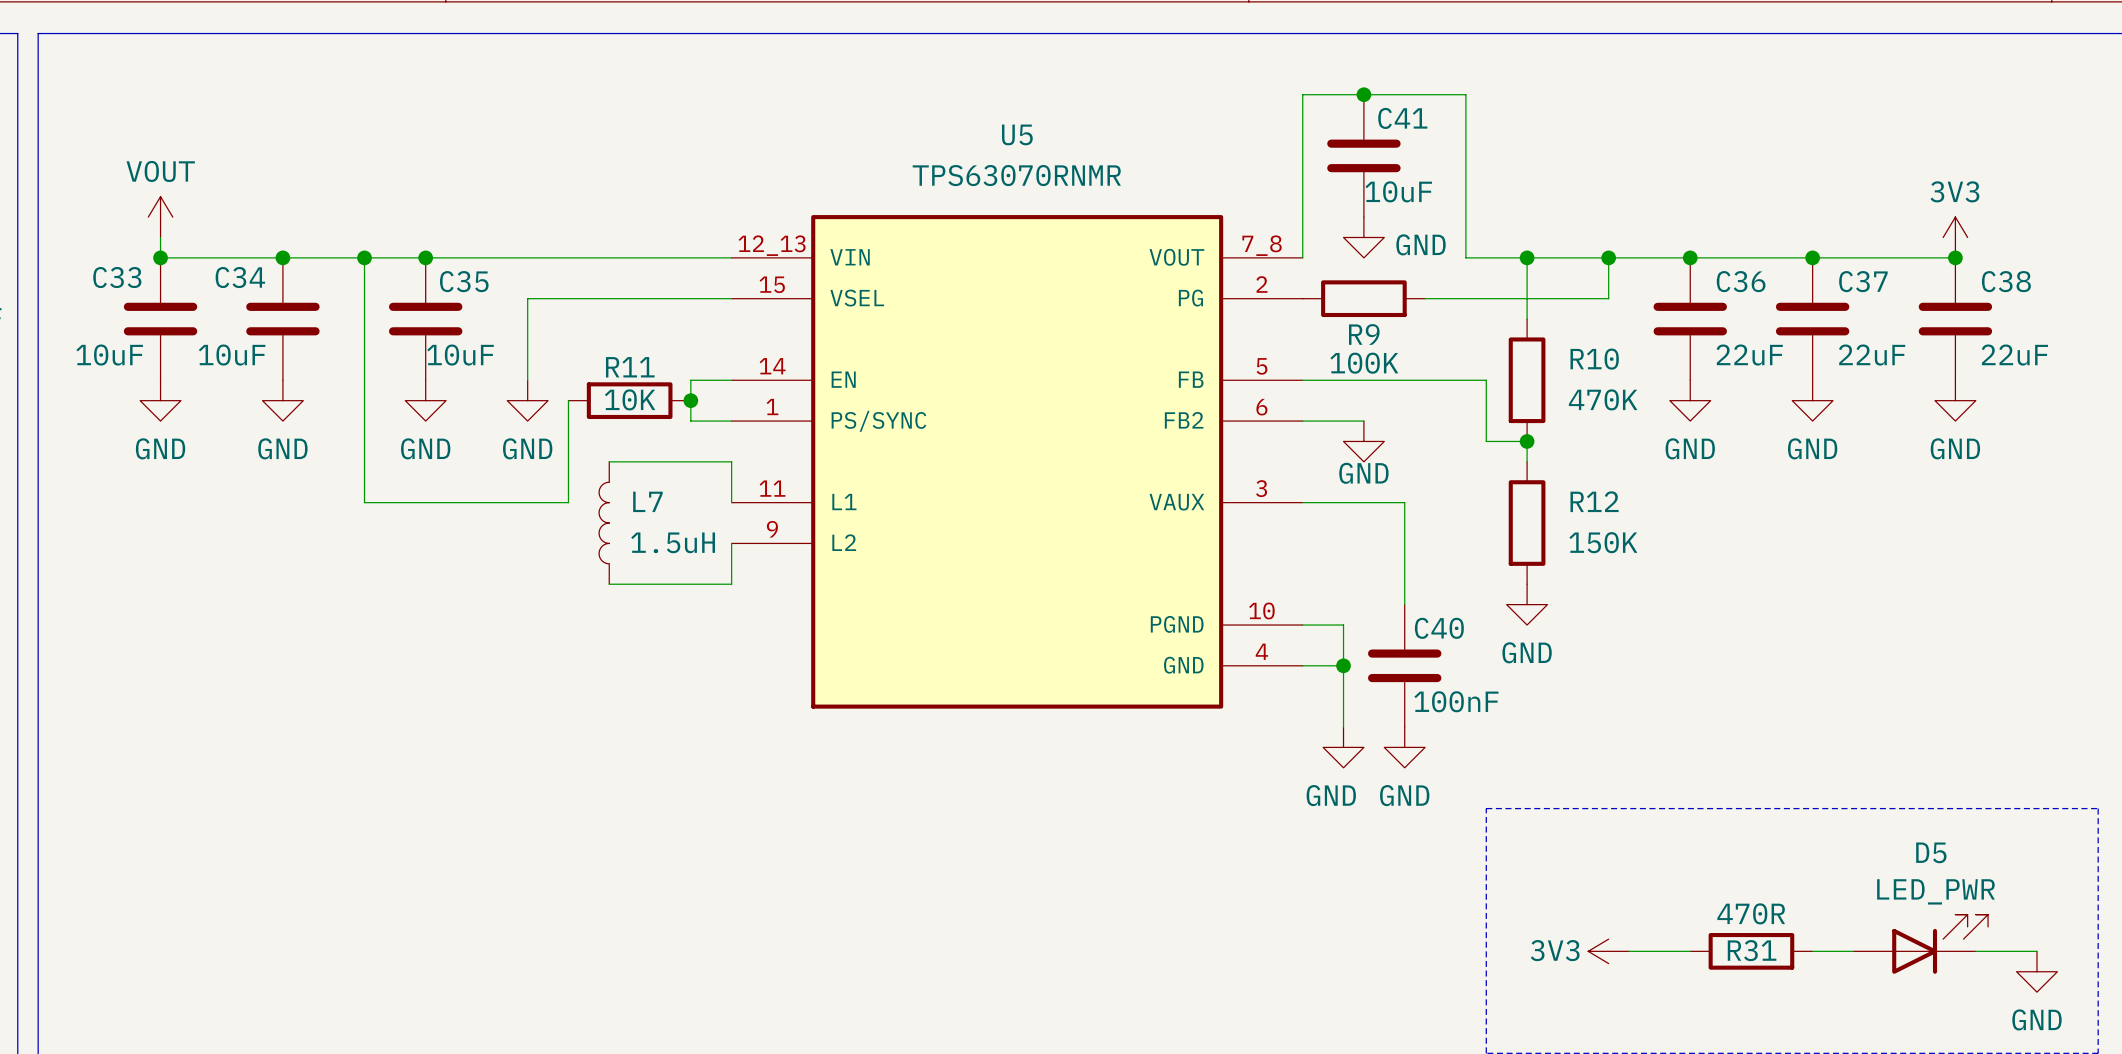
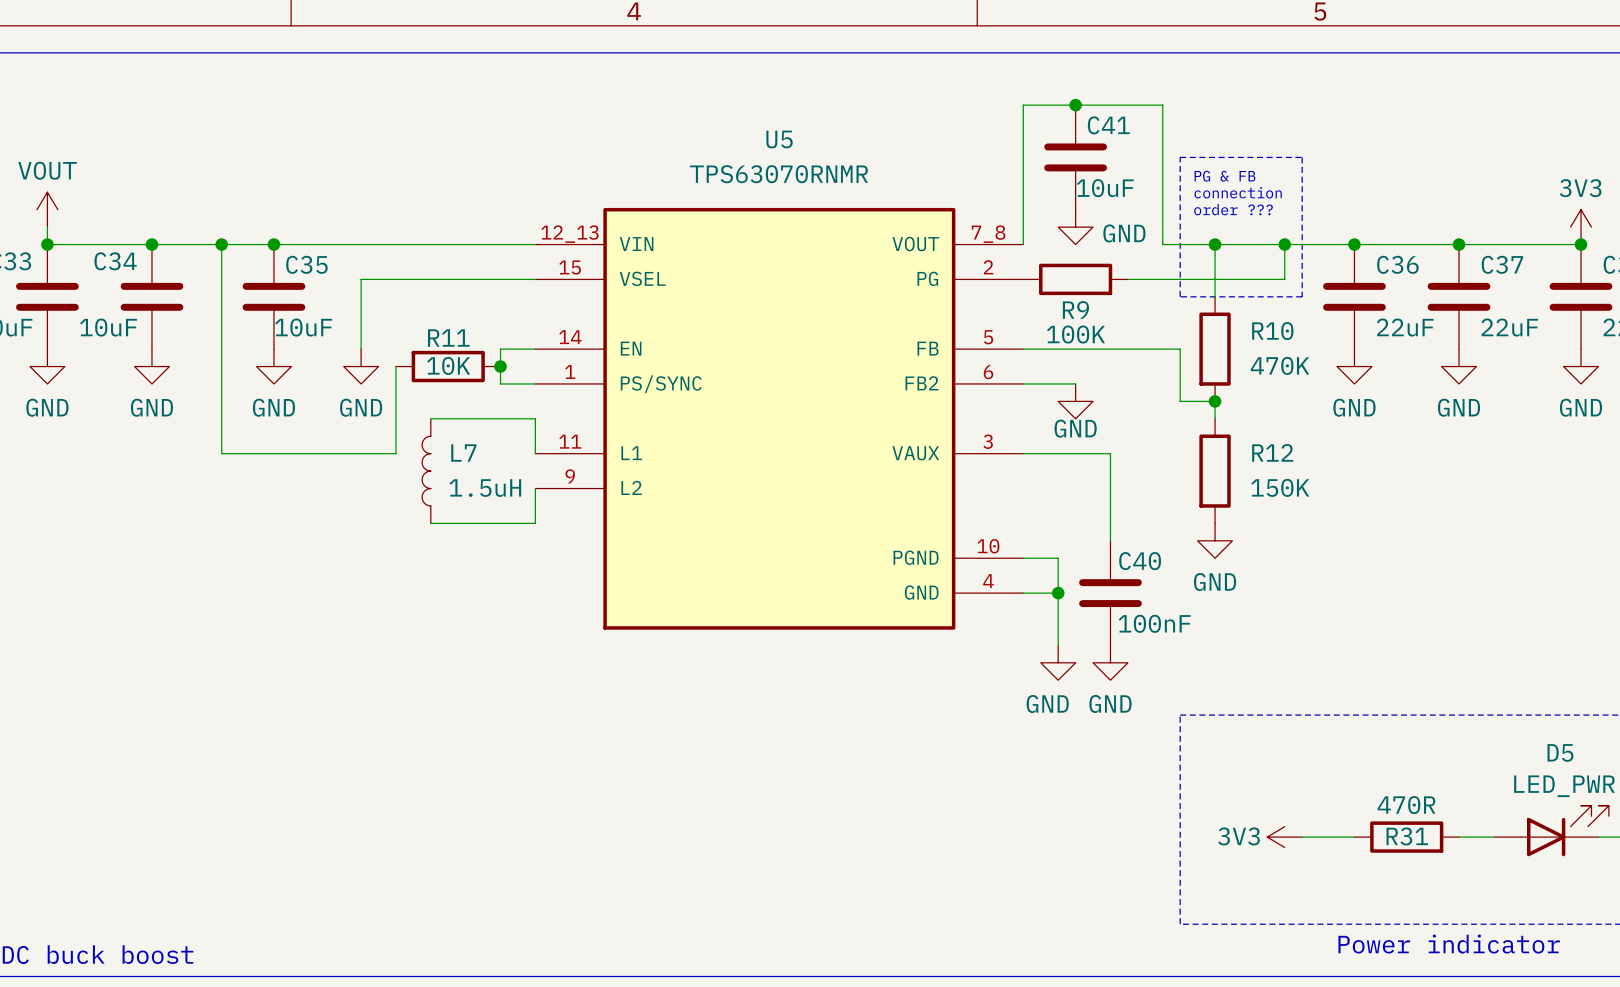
line: none -> (1180, 157) (1302, 157) (1302, 296) (1180, 296) (1180, 157)
text: none -> PG & FB (1224, 176)
text: none -> connection (1238, 192)
text: none -> order ??? (1233, 209)

